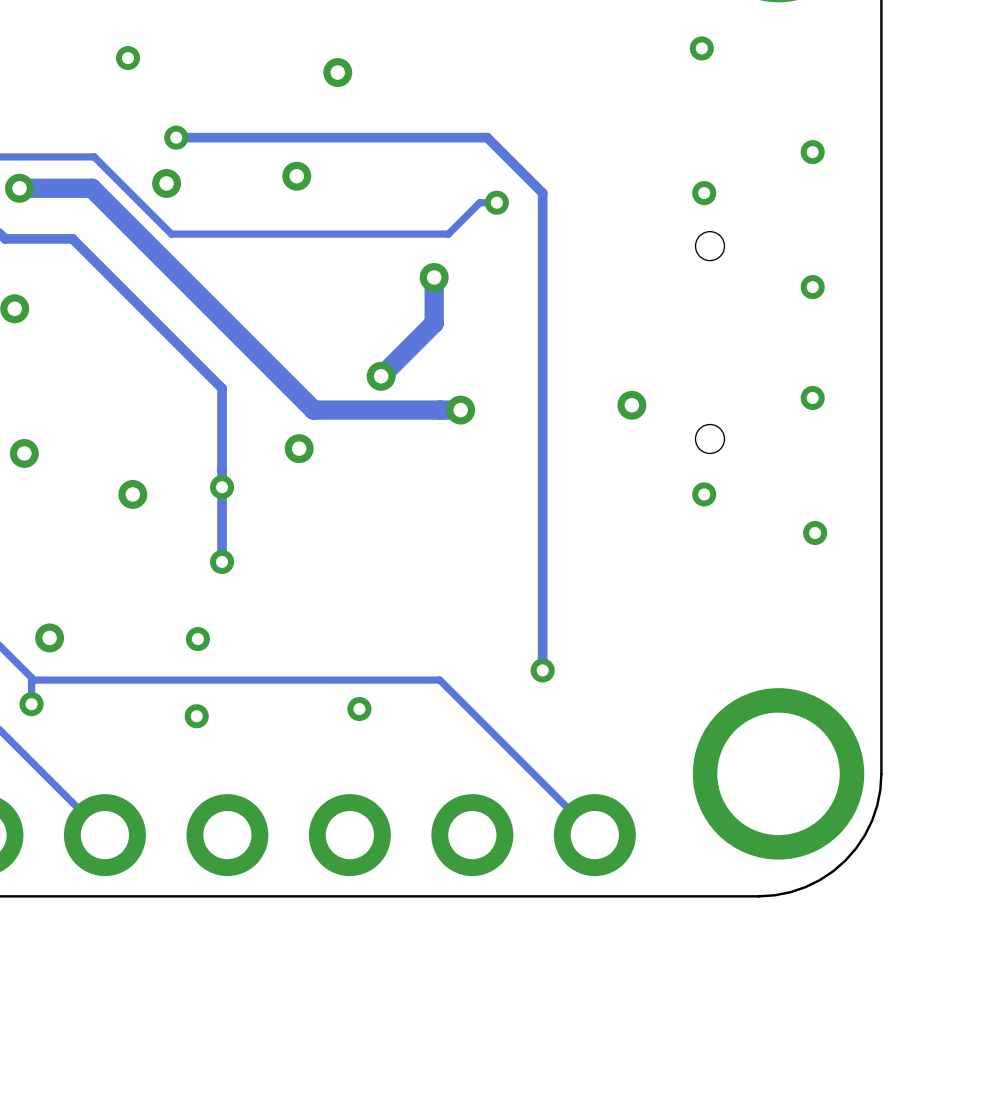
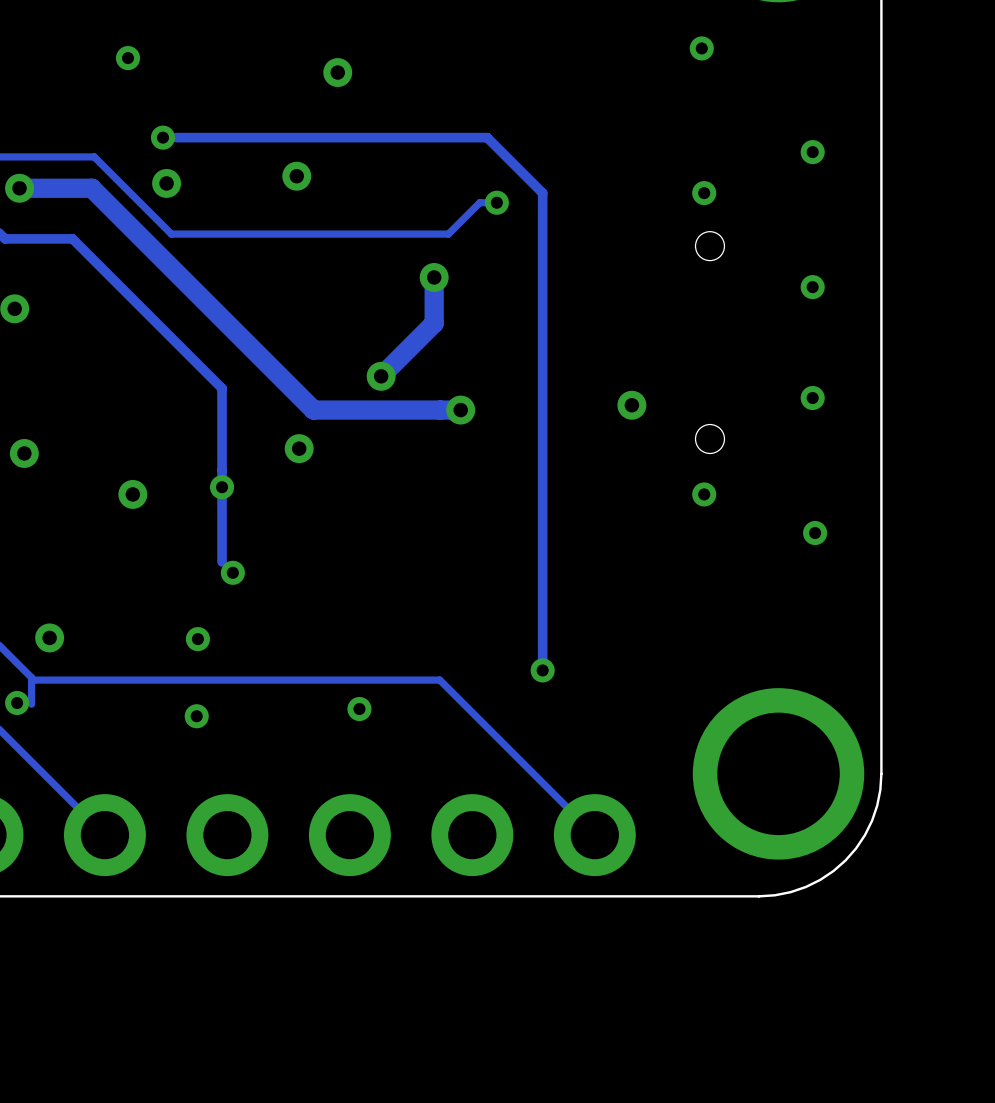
via position: (176, 137) -> (162, 137)
via position: (222, 561) -> (232, 572)
via position: (31, 704) -> (17, 702)

